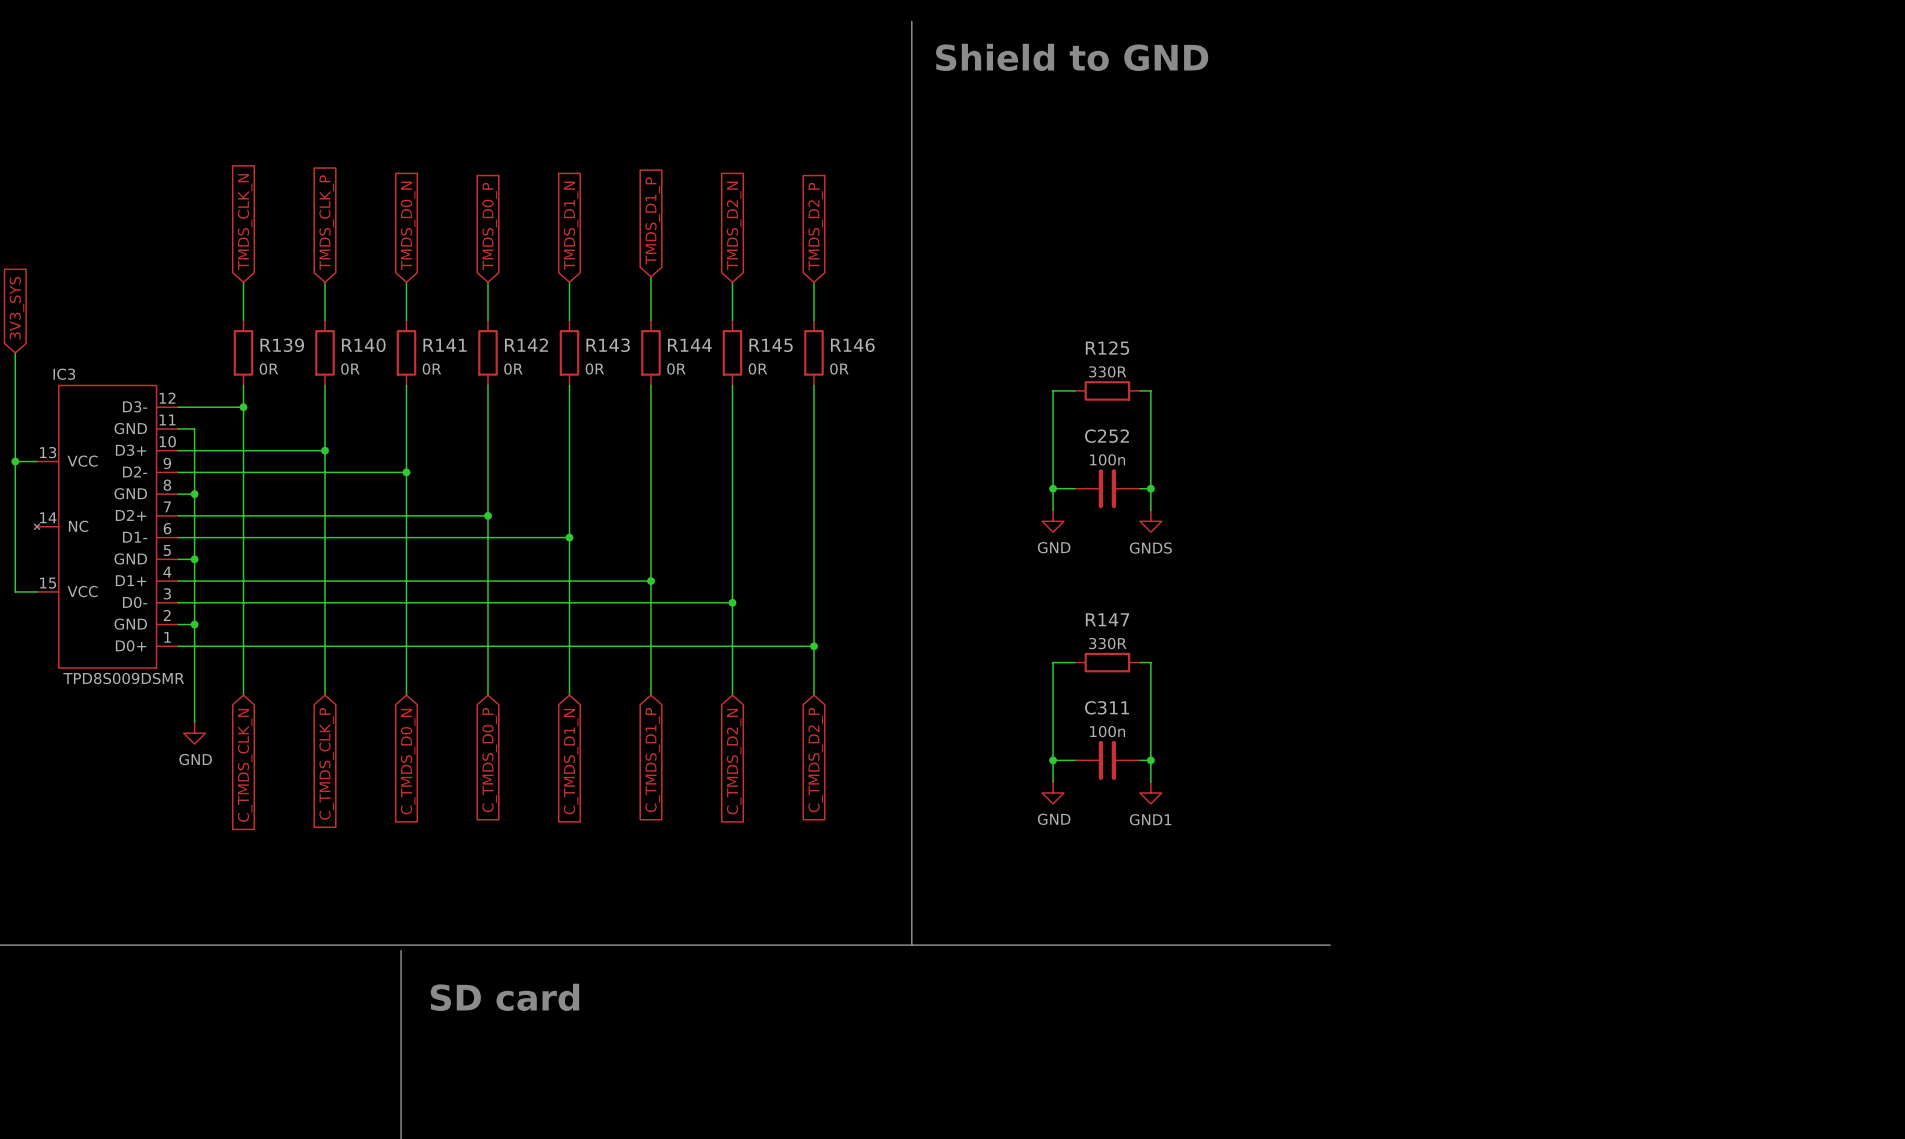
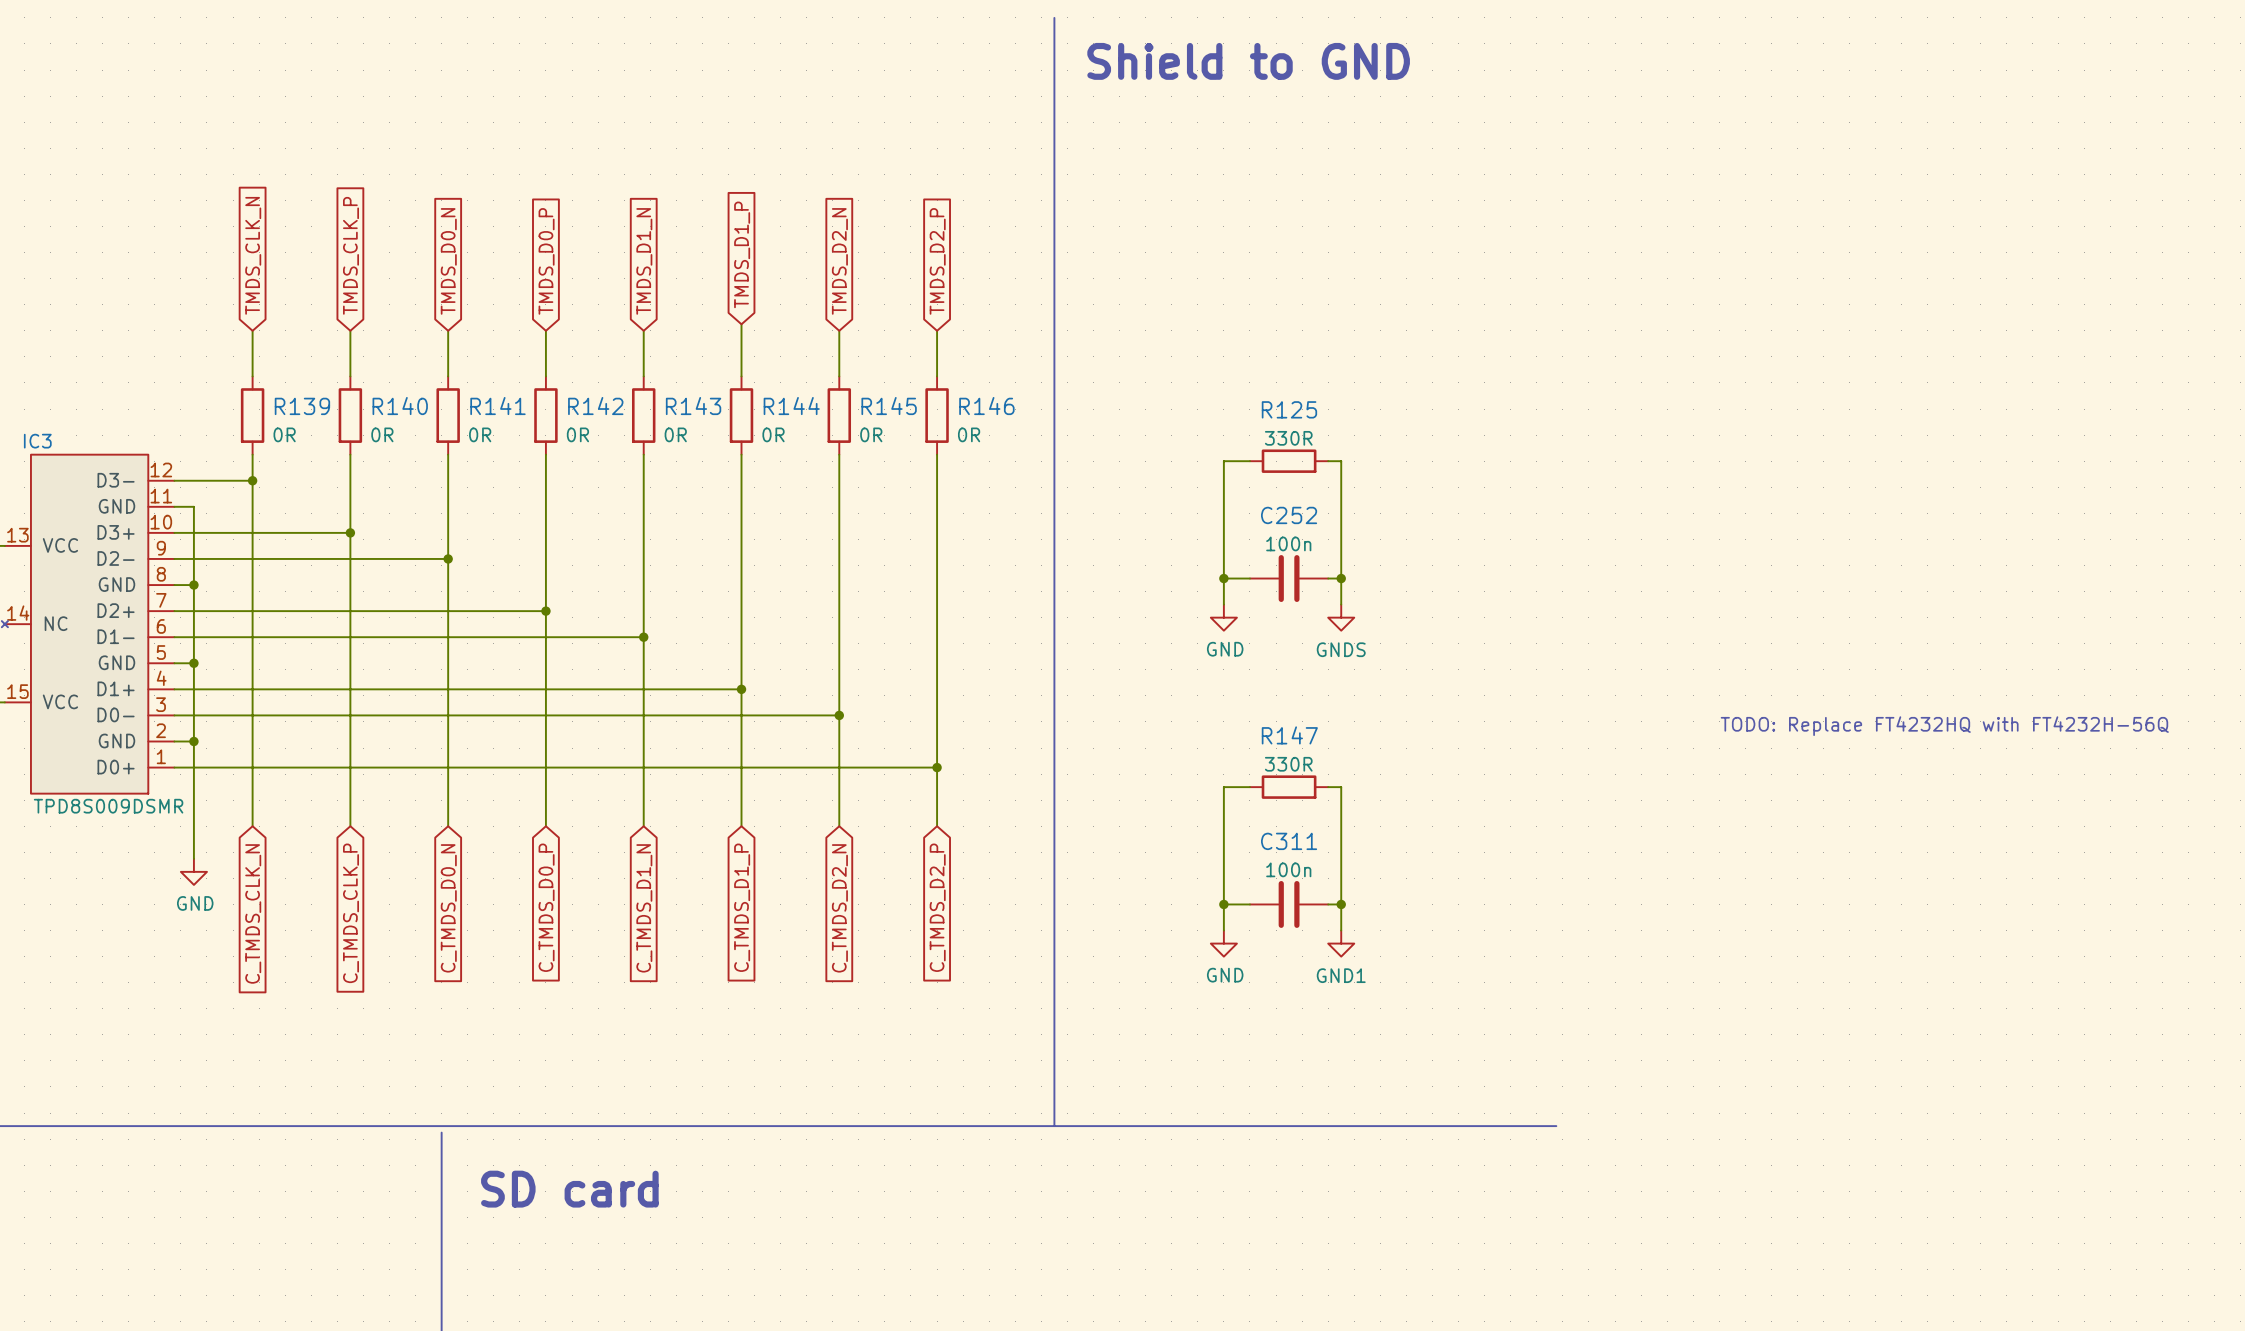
text: none -> TODO: Replace FT4232HQ with FT4232H-56Q (1944, 726)

